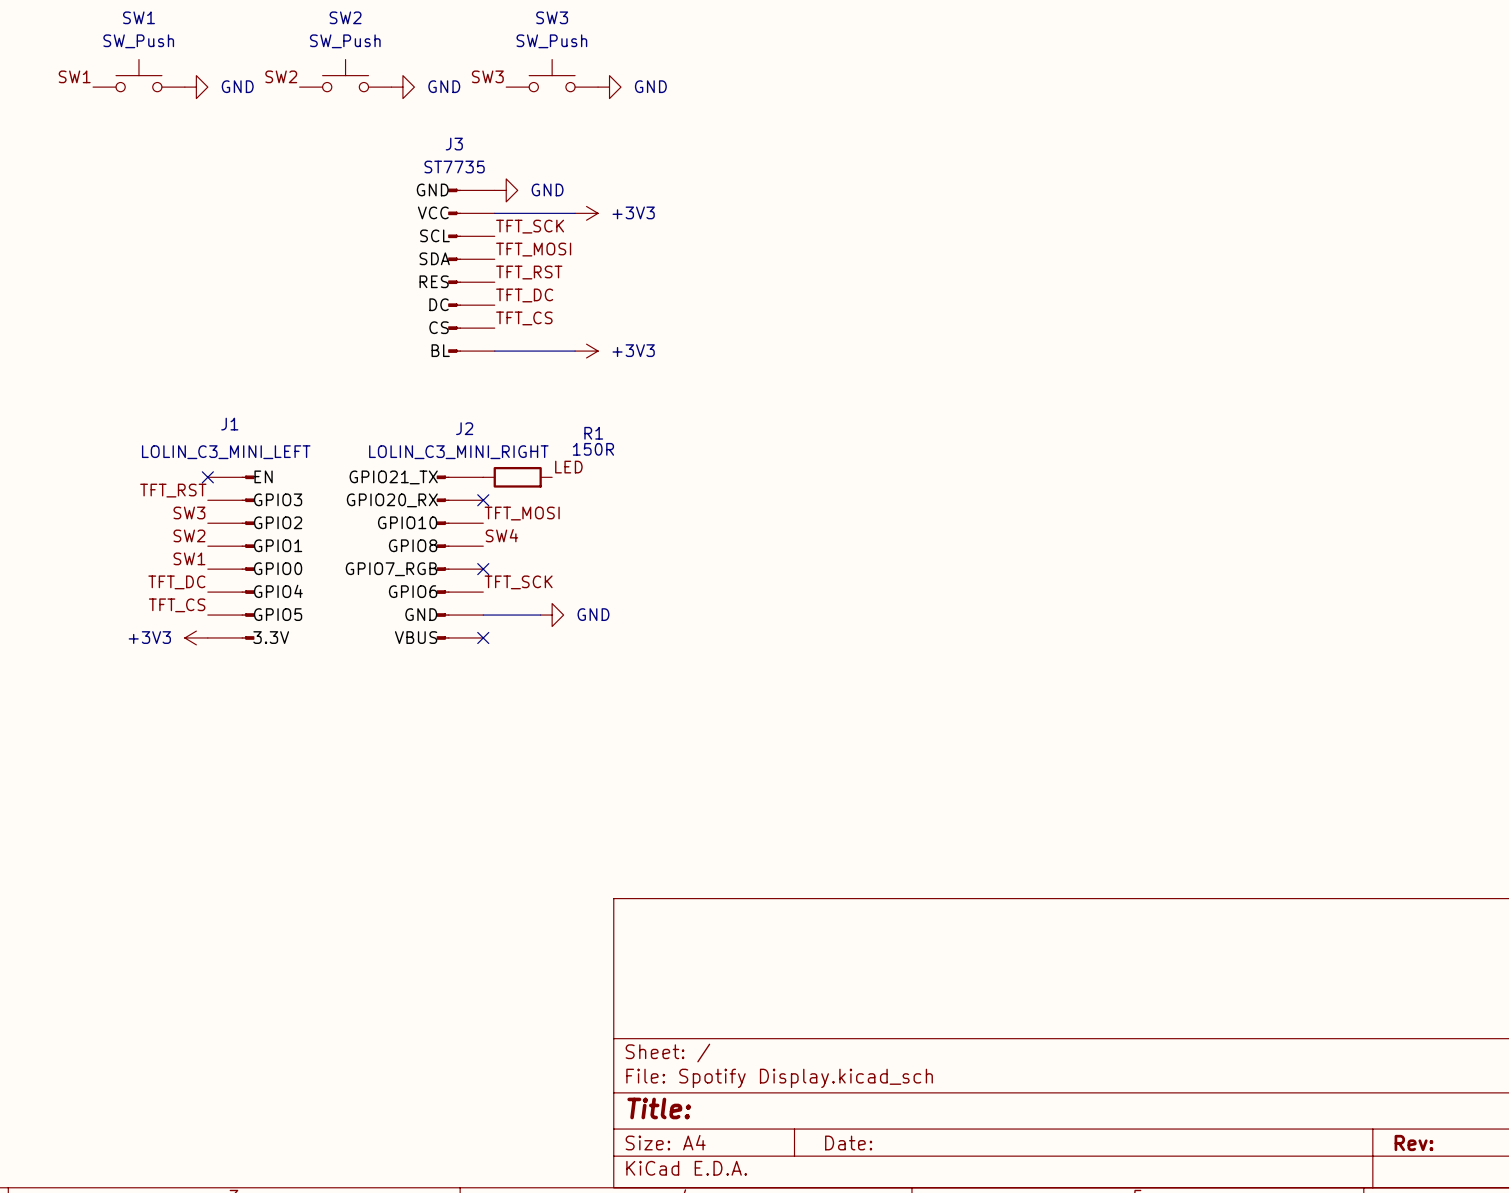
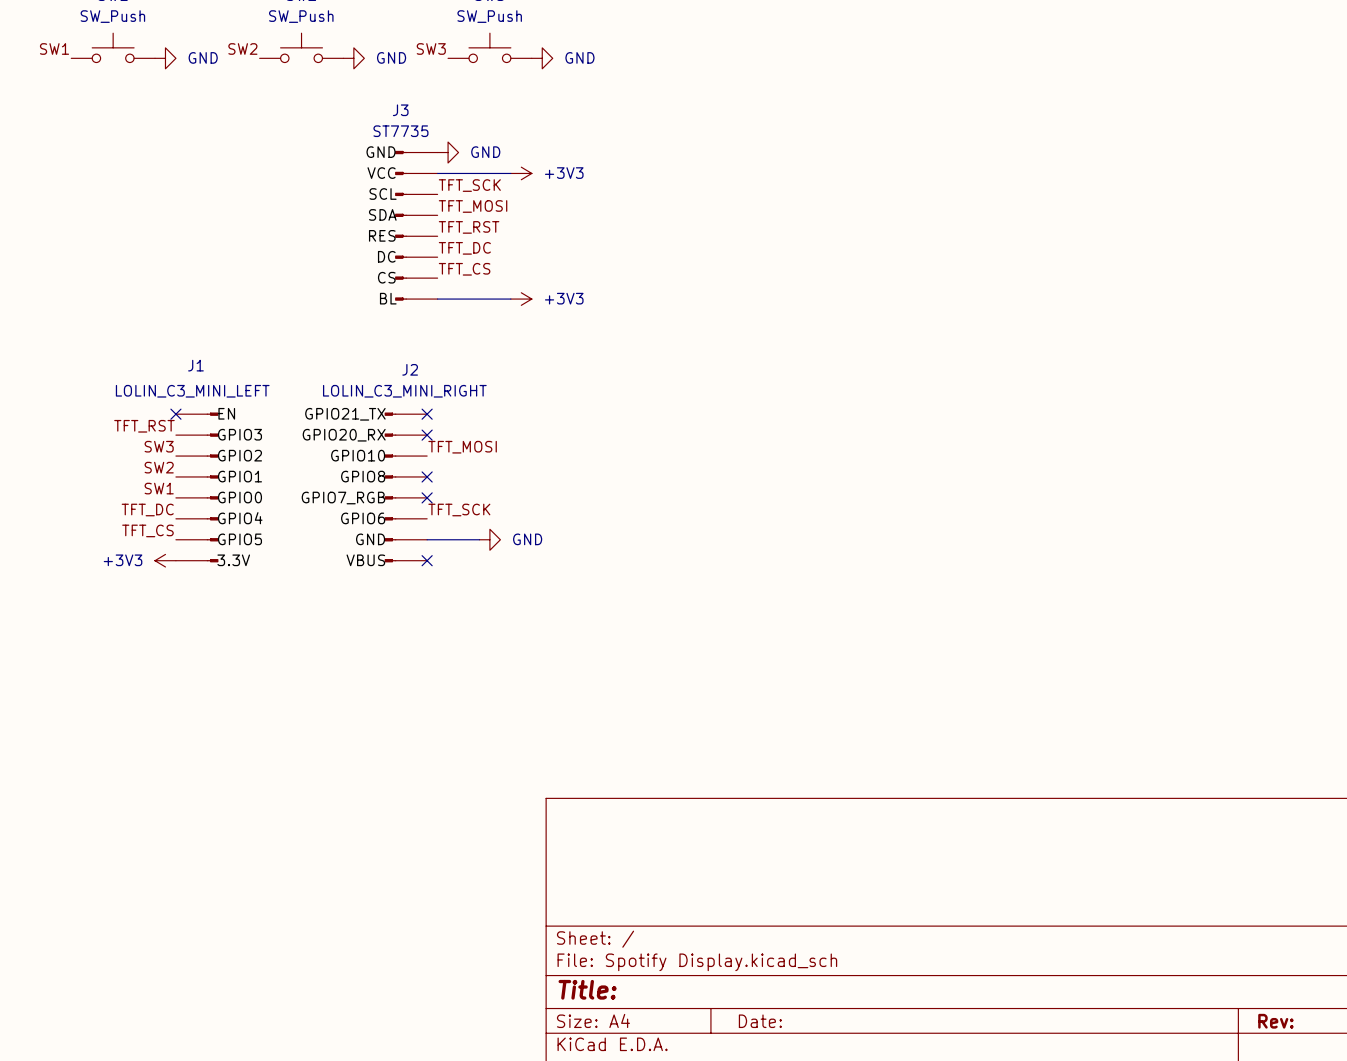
label: LED (568, 467) -> none
no-connect mark: none -> (427, 414)
R1: 150R (517, 477) -> none
label: SW4 (501, 535) -> none
no-connect mark: none -> (427, 476)

